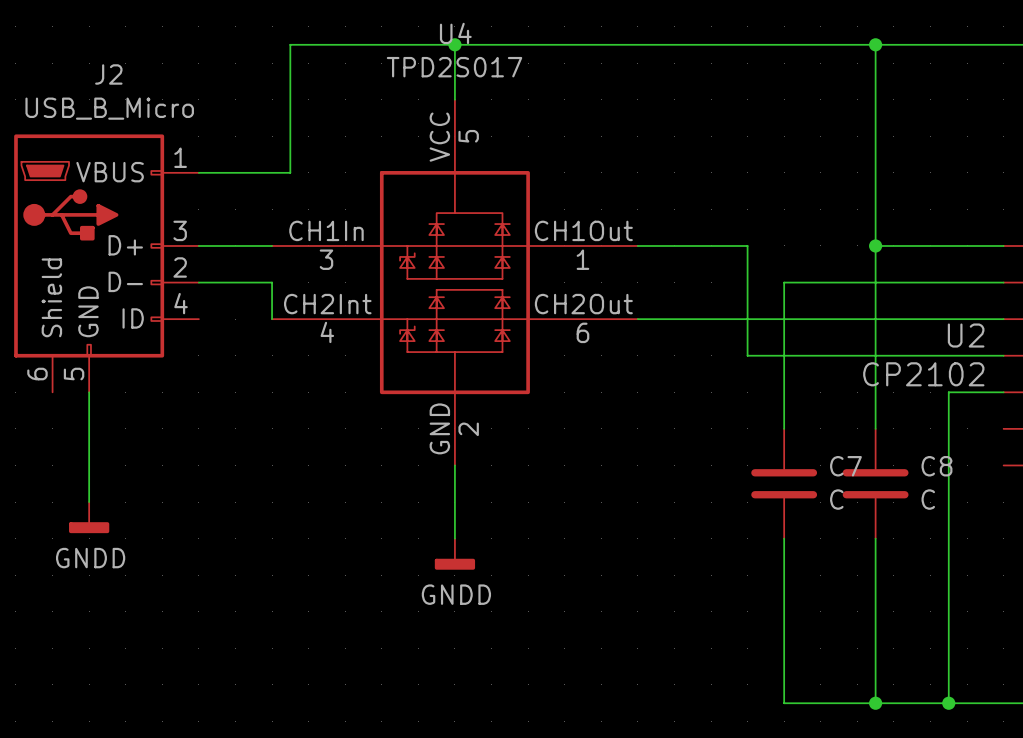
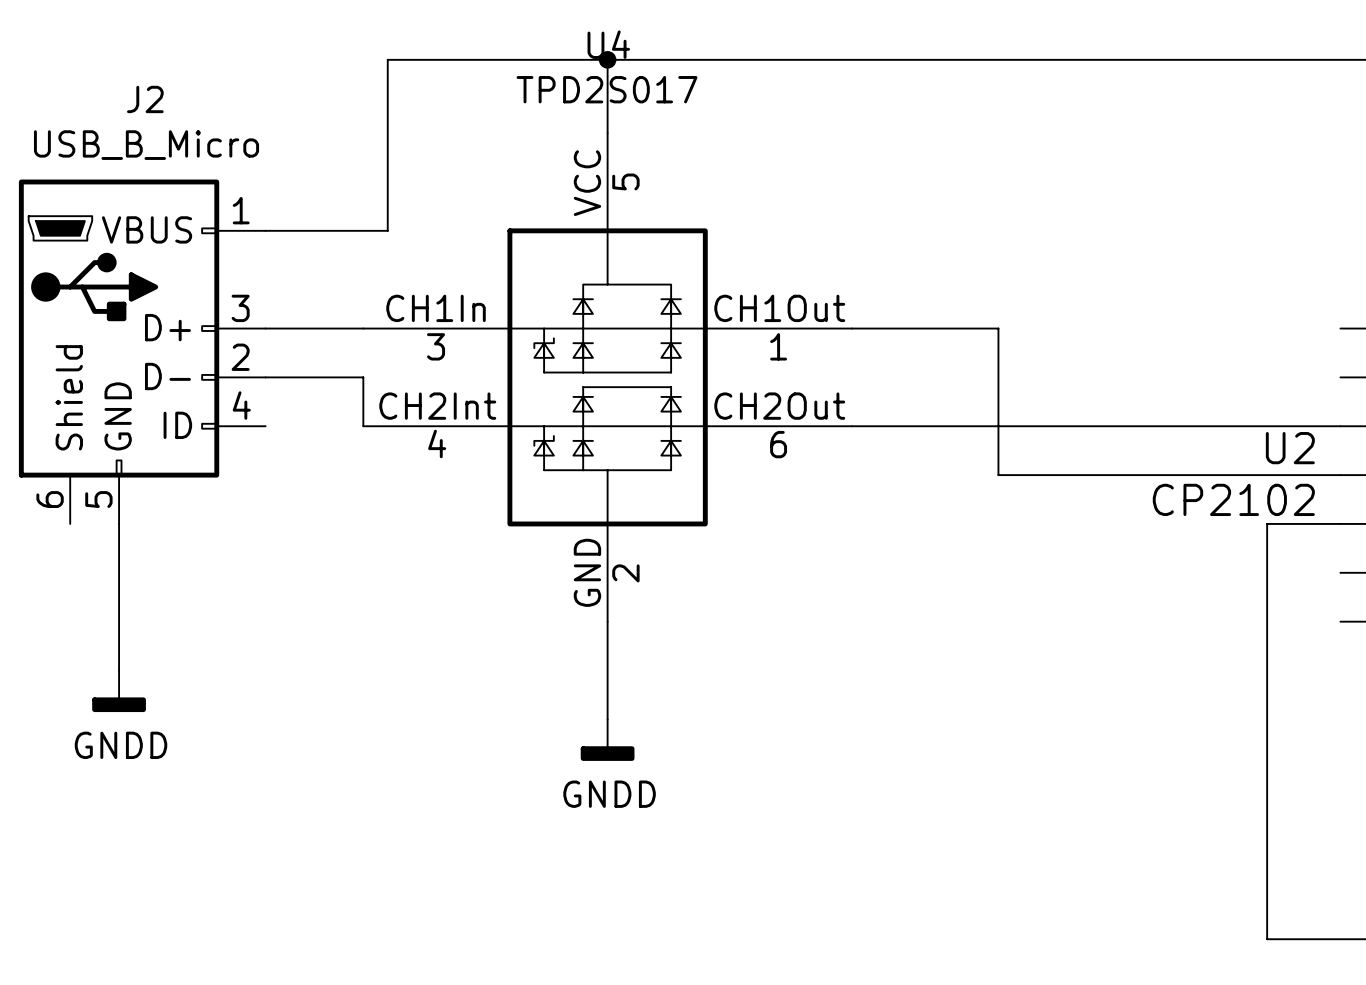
wire: (875, 44) (875, 428) -> none
junction: (875, 44) -> none
wire: (875, 245) (1003, 245) -> none
junction: (875, 245) -> none
wire: (1003, 282) (784, 282) (784, 428) -> none
C7: C (784, 483) -> none
C8: C (875, 483) -> none
wire: (784, 538) (784, 703) (948, 703) -> none
wire: (875, 538) (875, 703) -> none
junction: (875, 703) -> none
junction: (948, 703) -> none

